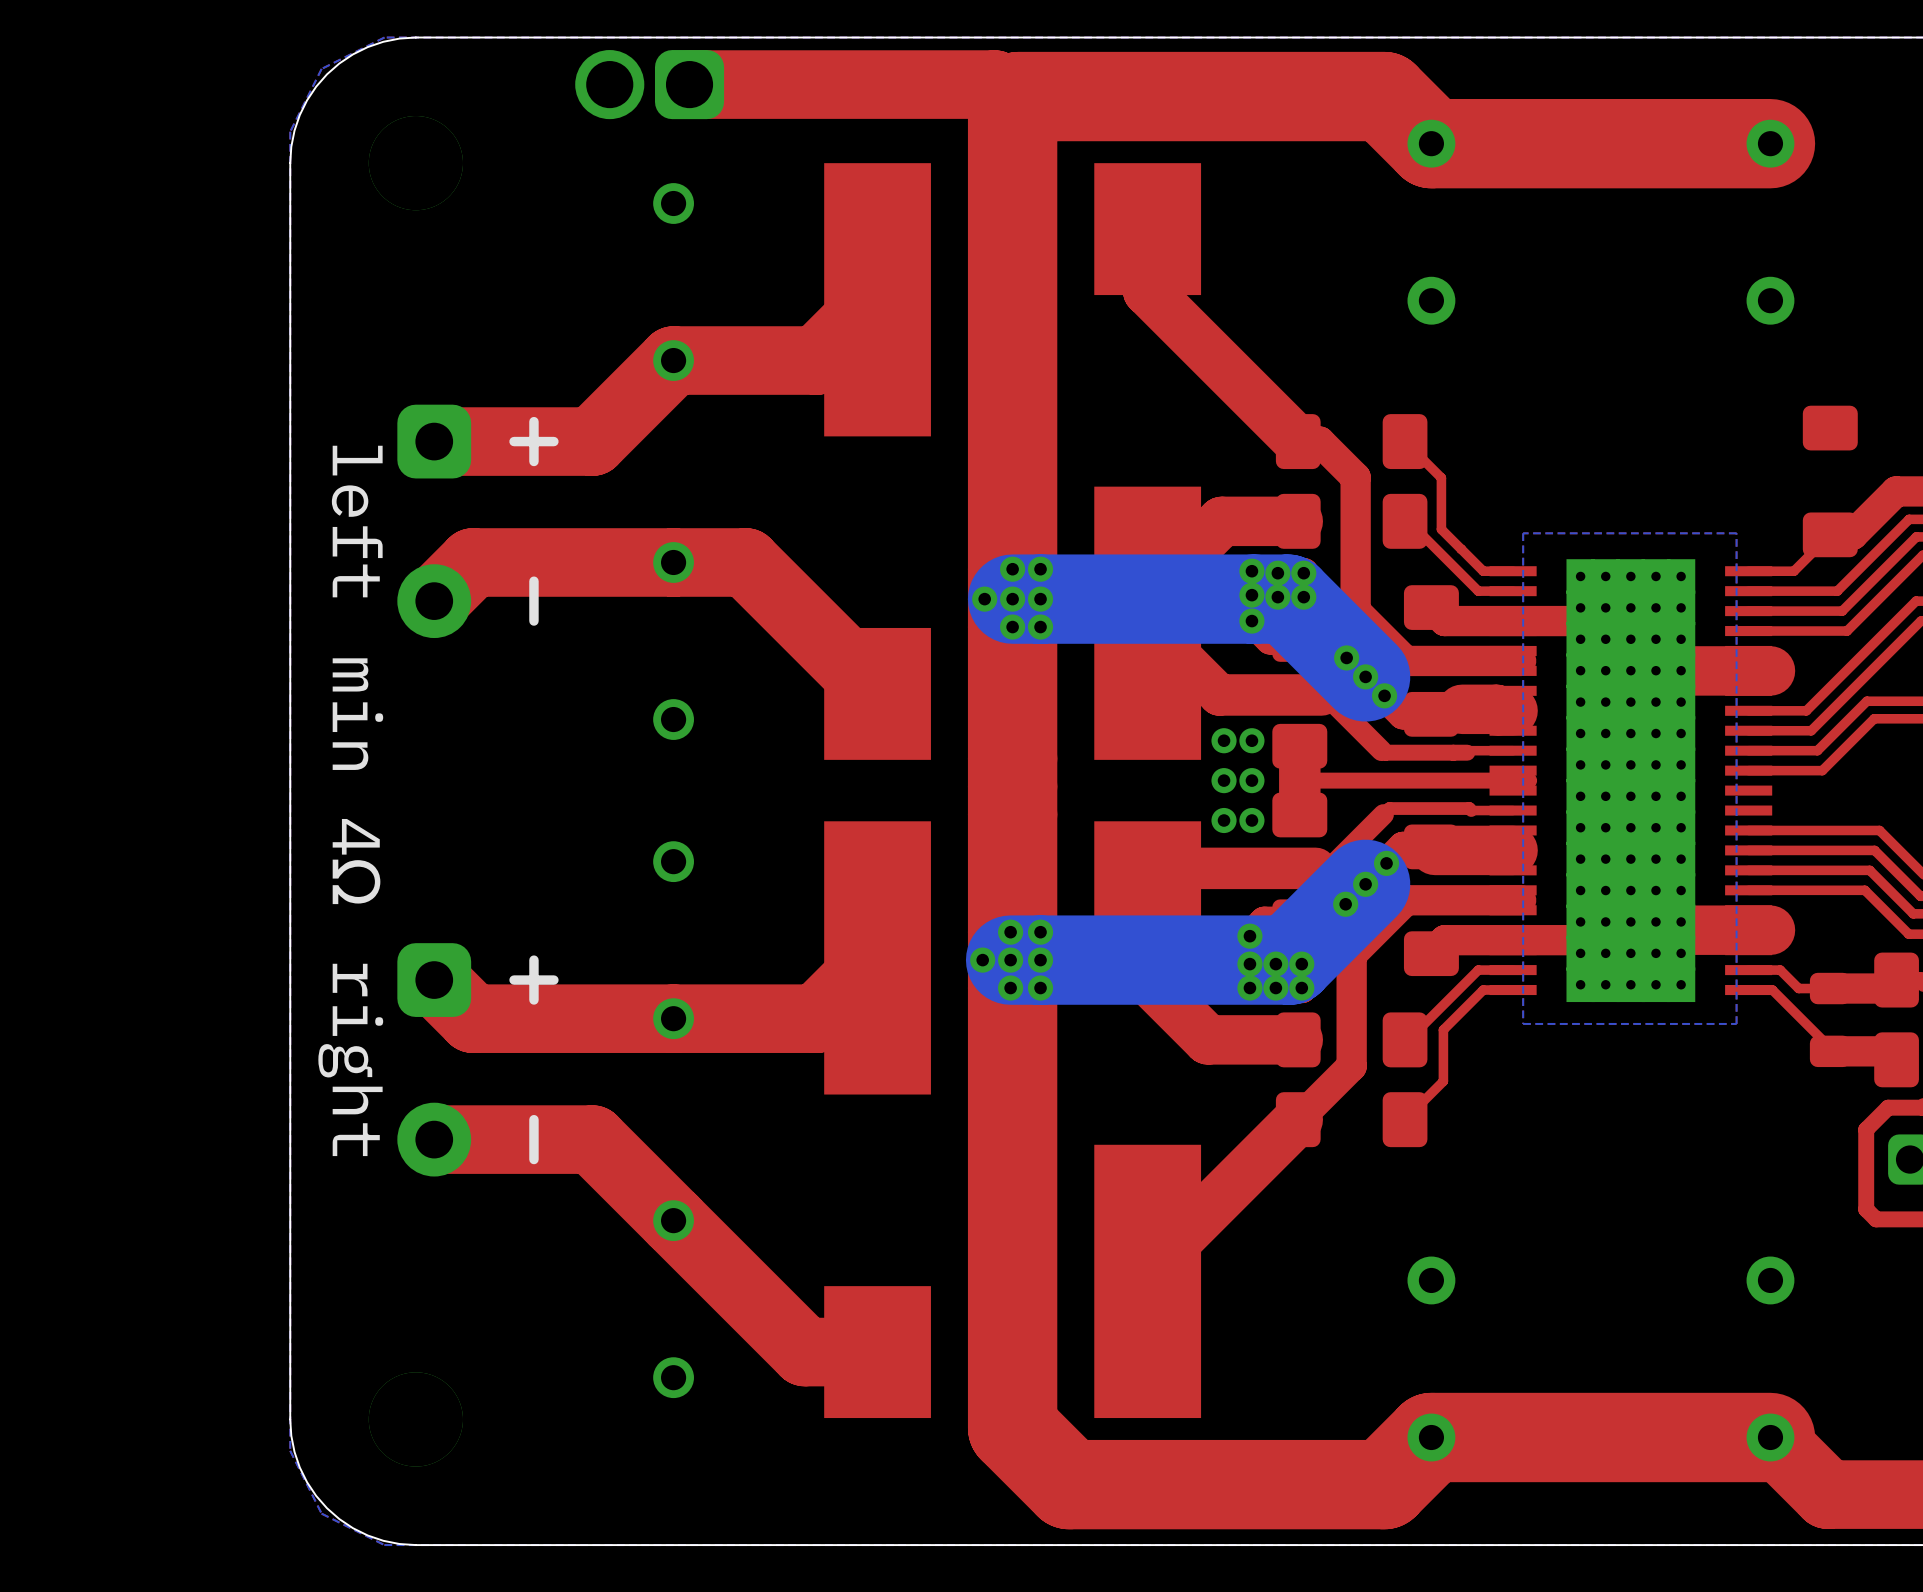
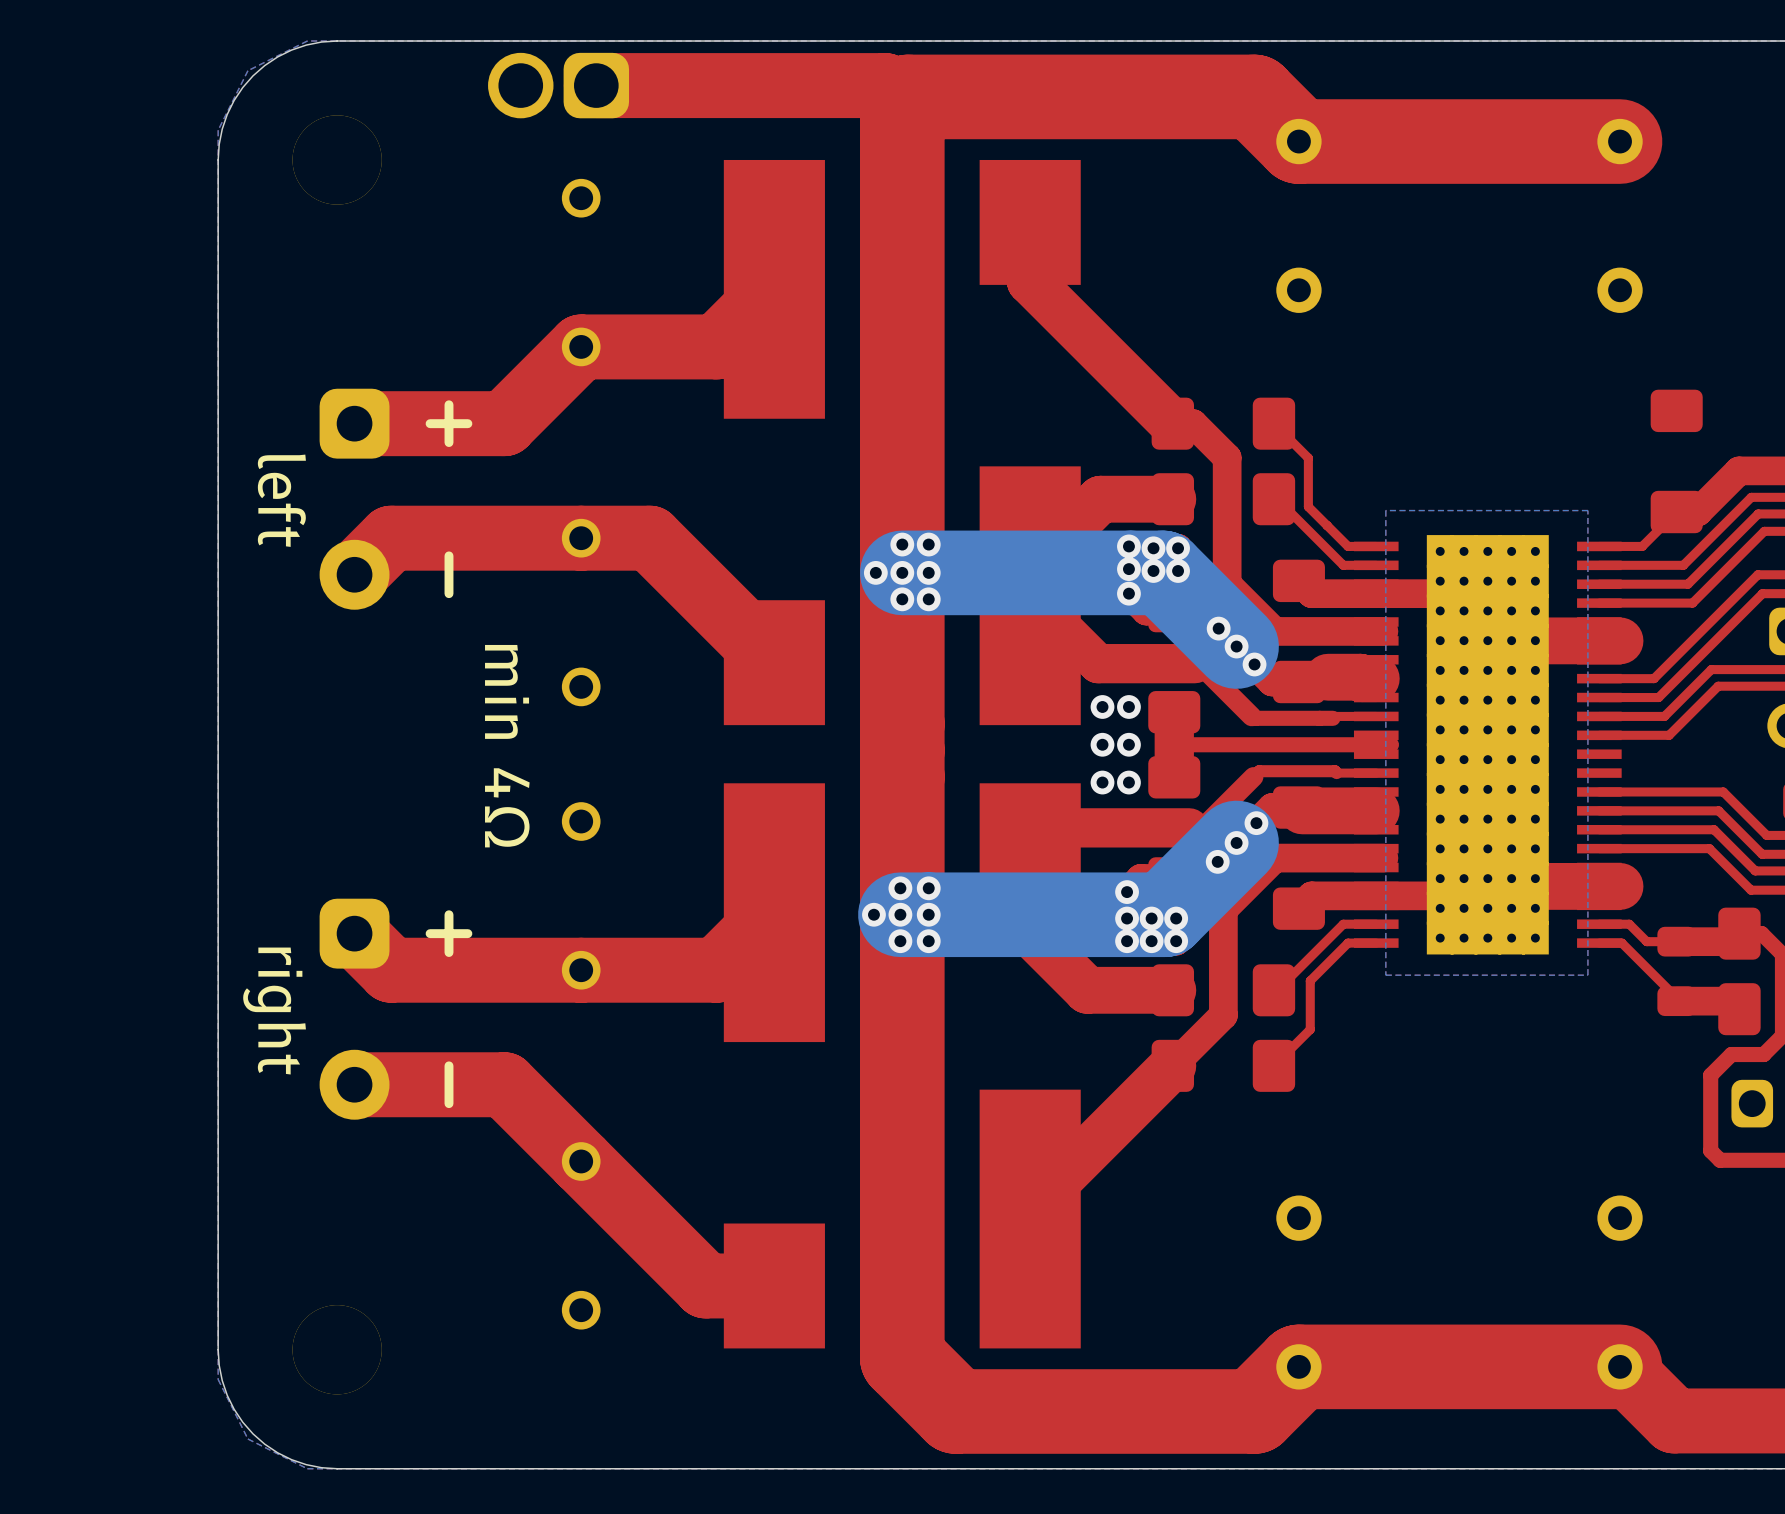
text position: min 4Ω (357, 781) -> min 4Ω (507, 746)

